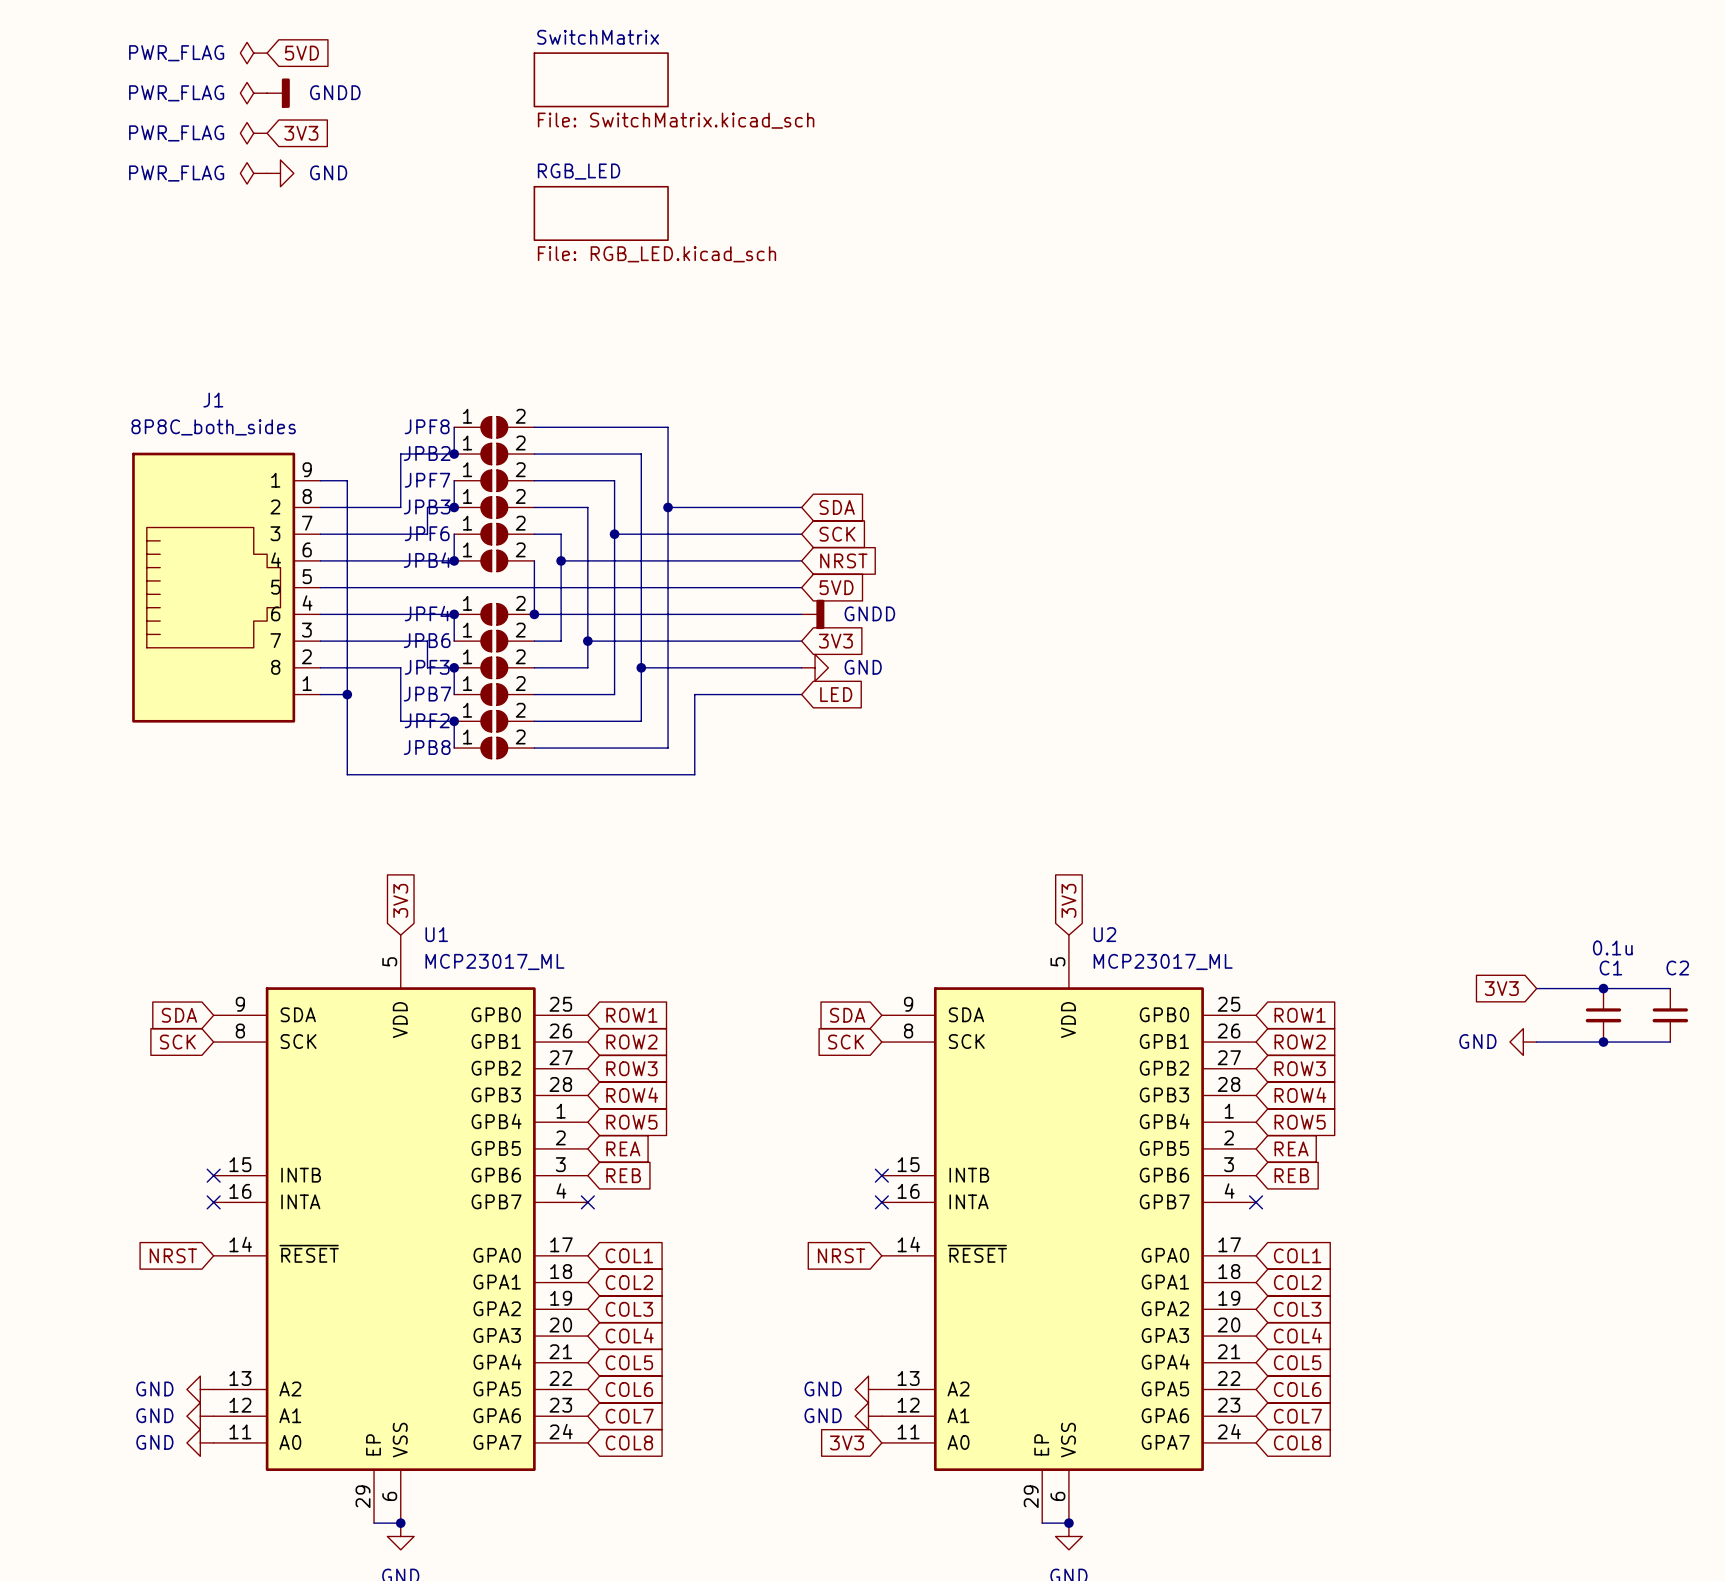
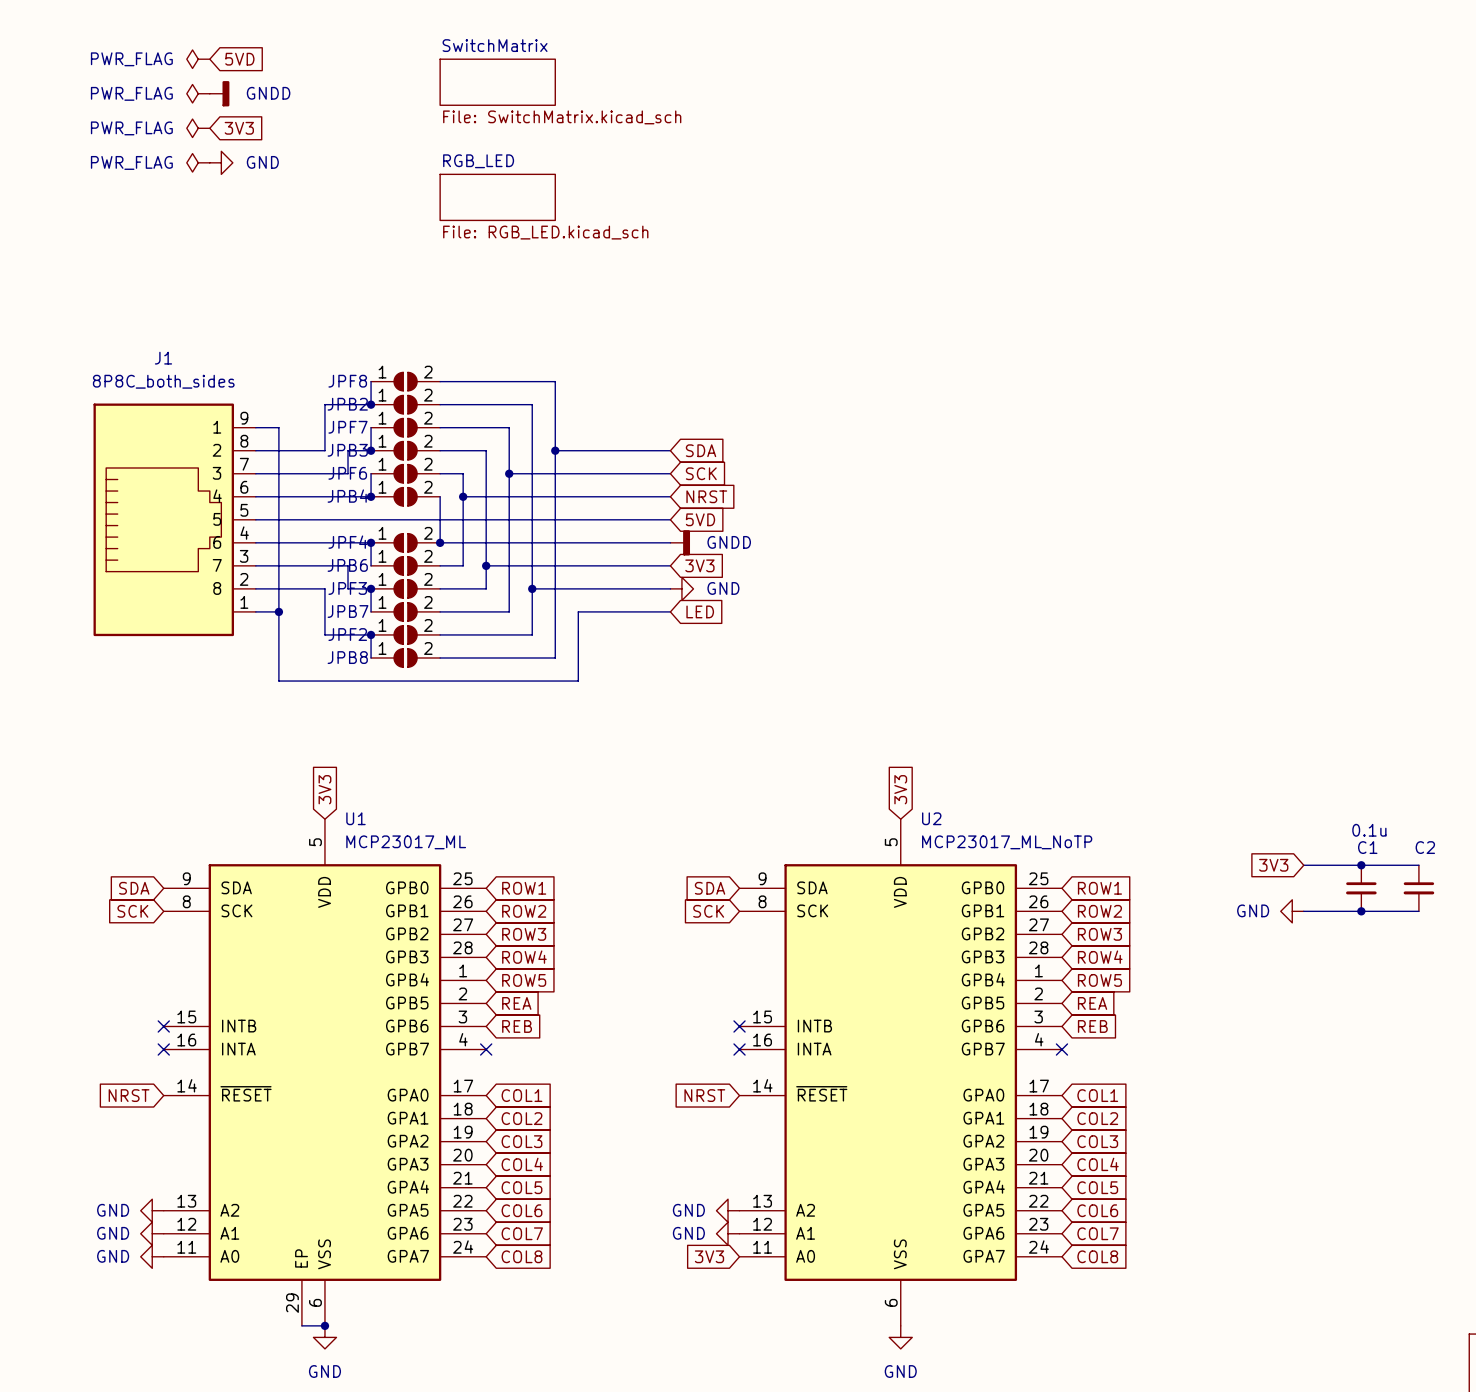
U2 symbol: [881, 935, 1257, 1524] -> [739, 819, 1062, 1326]
U2 value: MCP23017_ML (1163, 961) -> MCP23017_ML_NoTP (1007, 842)
wire: (1042, 1523) (1068, 1523) -> none
junction: (1068, 1523) -> none

